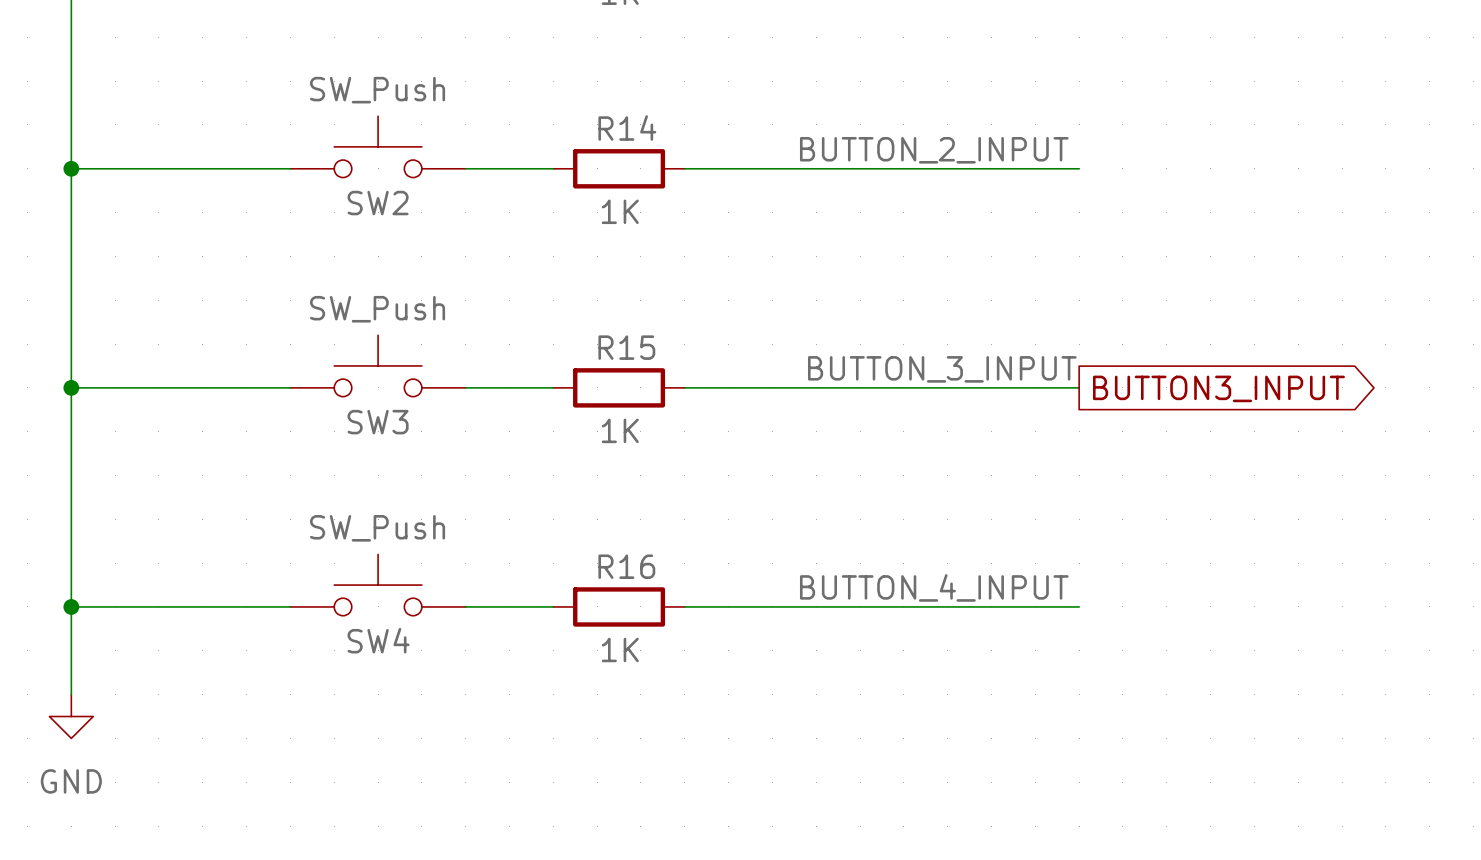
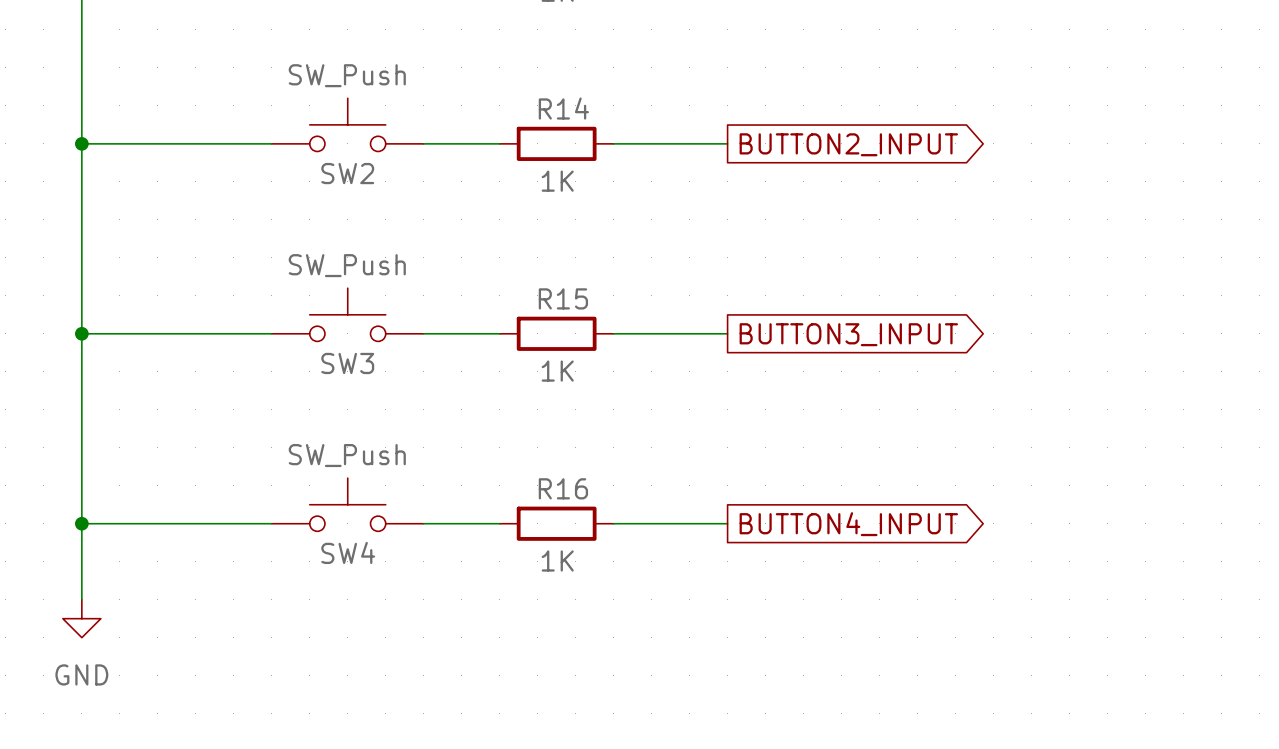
label: BUTTON_2_INPUT (934, 150) -> none
wire: (816, 168) (1079, 168) -> none
global label: none -> BUTTON2_INPUT (848, 144)
label: BUTTON_3_INPUT (942, 369) -> none
wire: (816, 387) (1079, 387) -> none
global label position: BUTTON3_INPUT (1218, 388) -> BUTTON3_INPUT (848, 334)
label: BUTTON_4_INPUT (934, 587) -> none
wire: (816, 606) (1079, 606) -> none
global label: none -> BUTTON4_INPUT (848, 524)

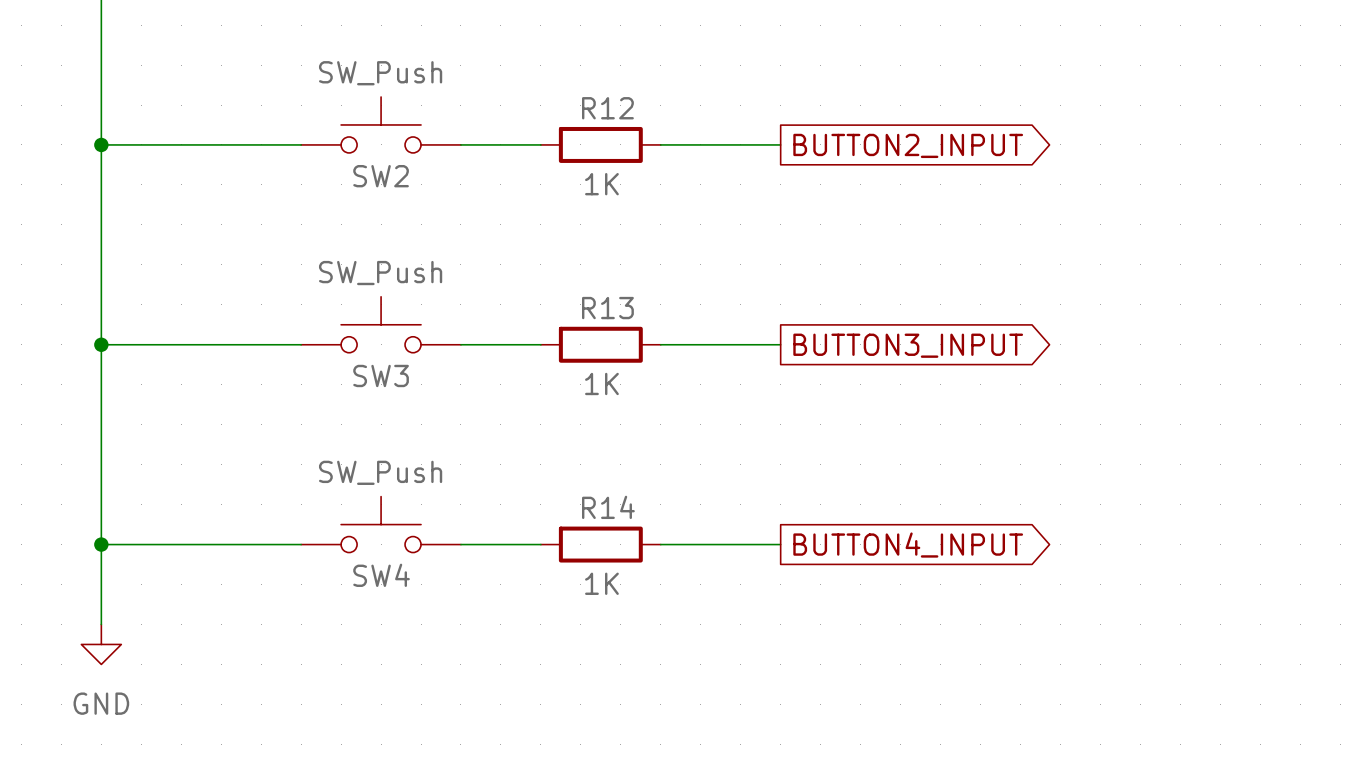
R14 name: R14 (563, 108) -> R12 (607, 108)
R15 name: R15 (563, 298) -> R13 (607, 308)
R16 name: R16 (563, 488) -> R14 (608, 507)

